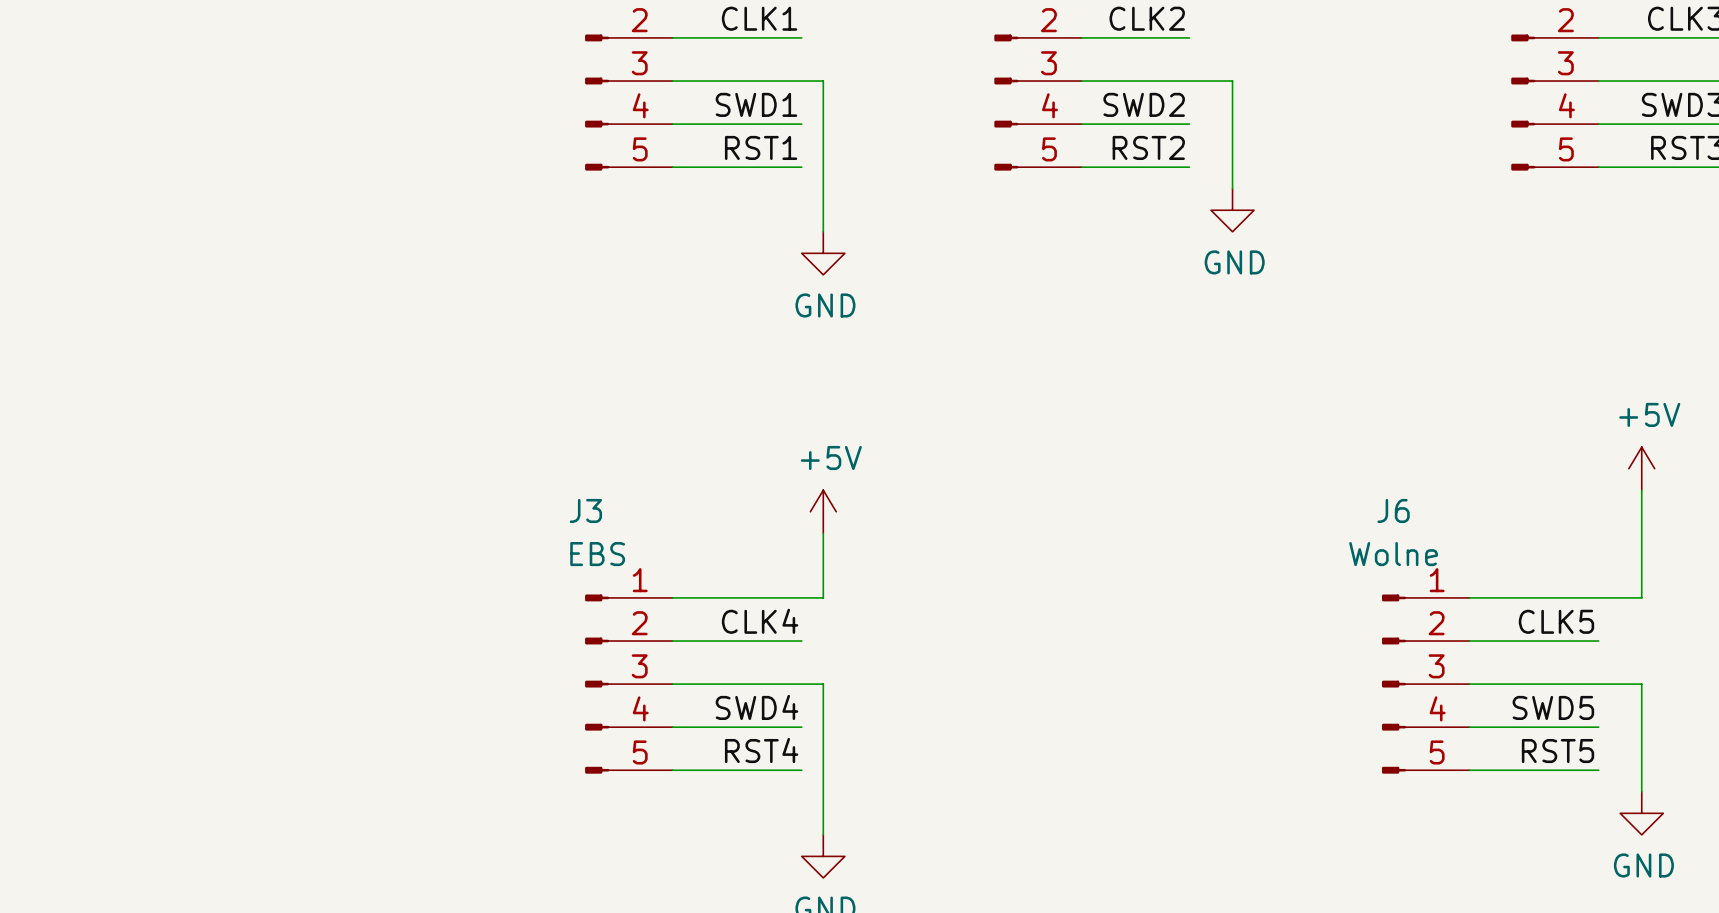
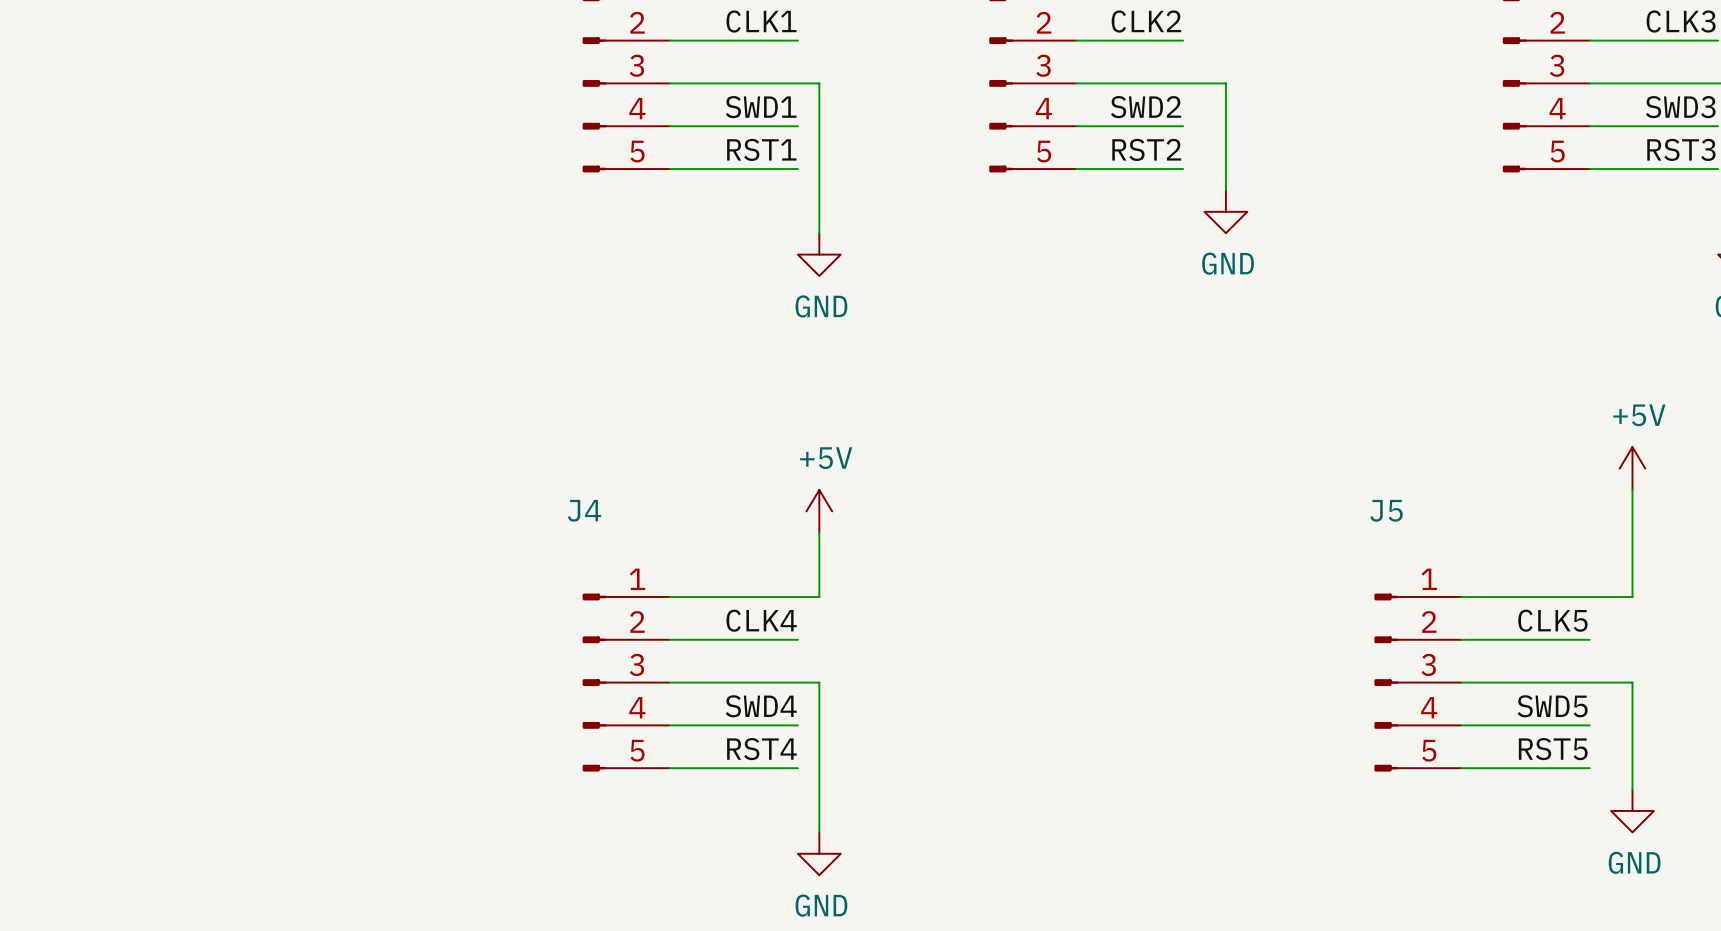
J3 name: J3 (585, 510) -> J4 (584, 510)
J6 name: J6 (1393, 510) -> J5 (1386, 510)
J3 value: EBS (597, 554) -> none
J6 value: Wolne (1393, 554) -> none

